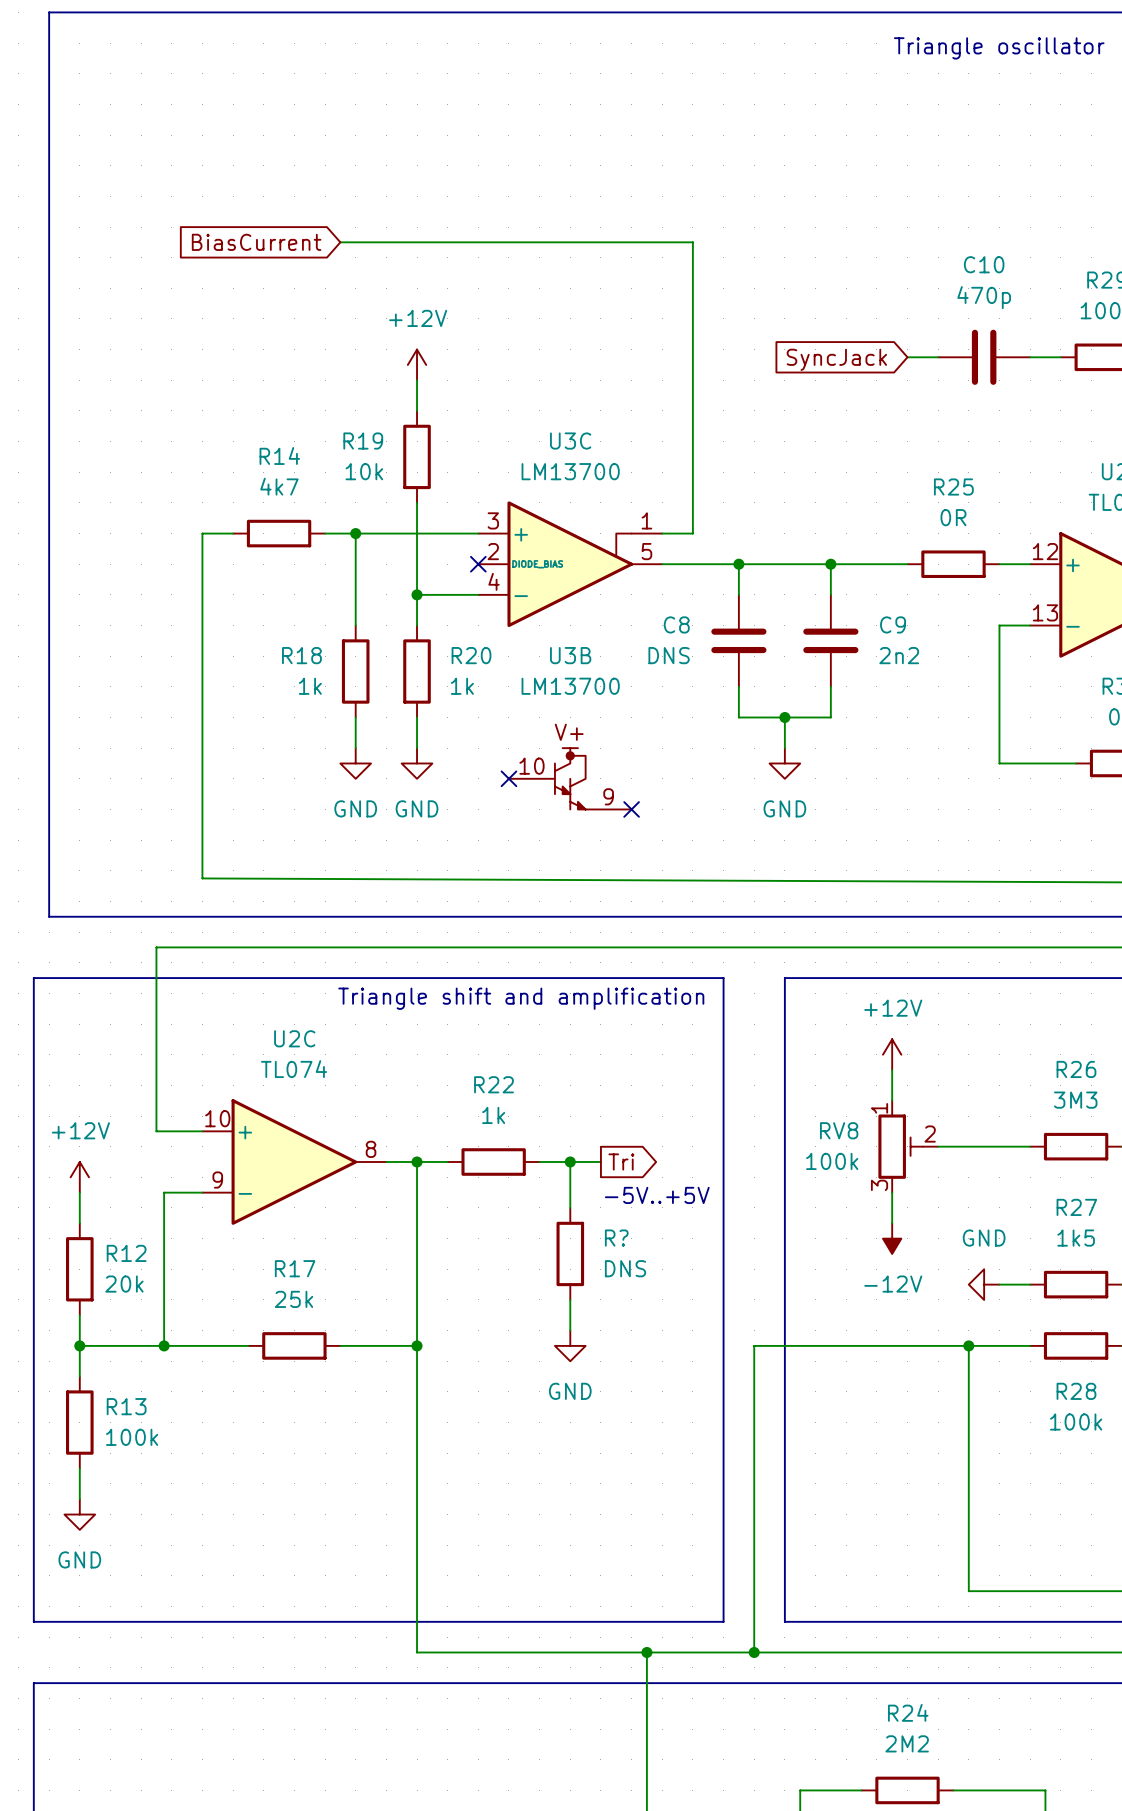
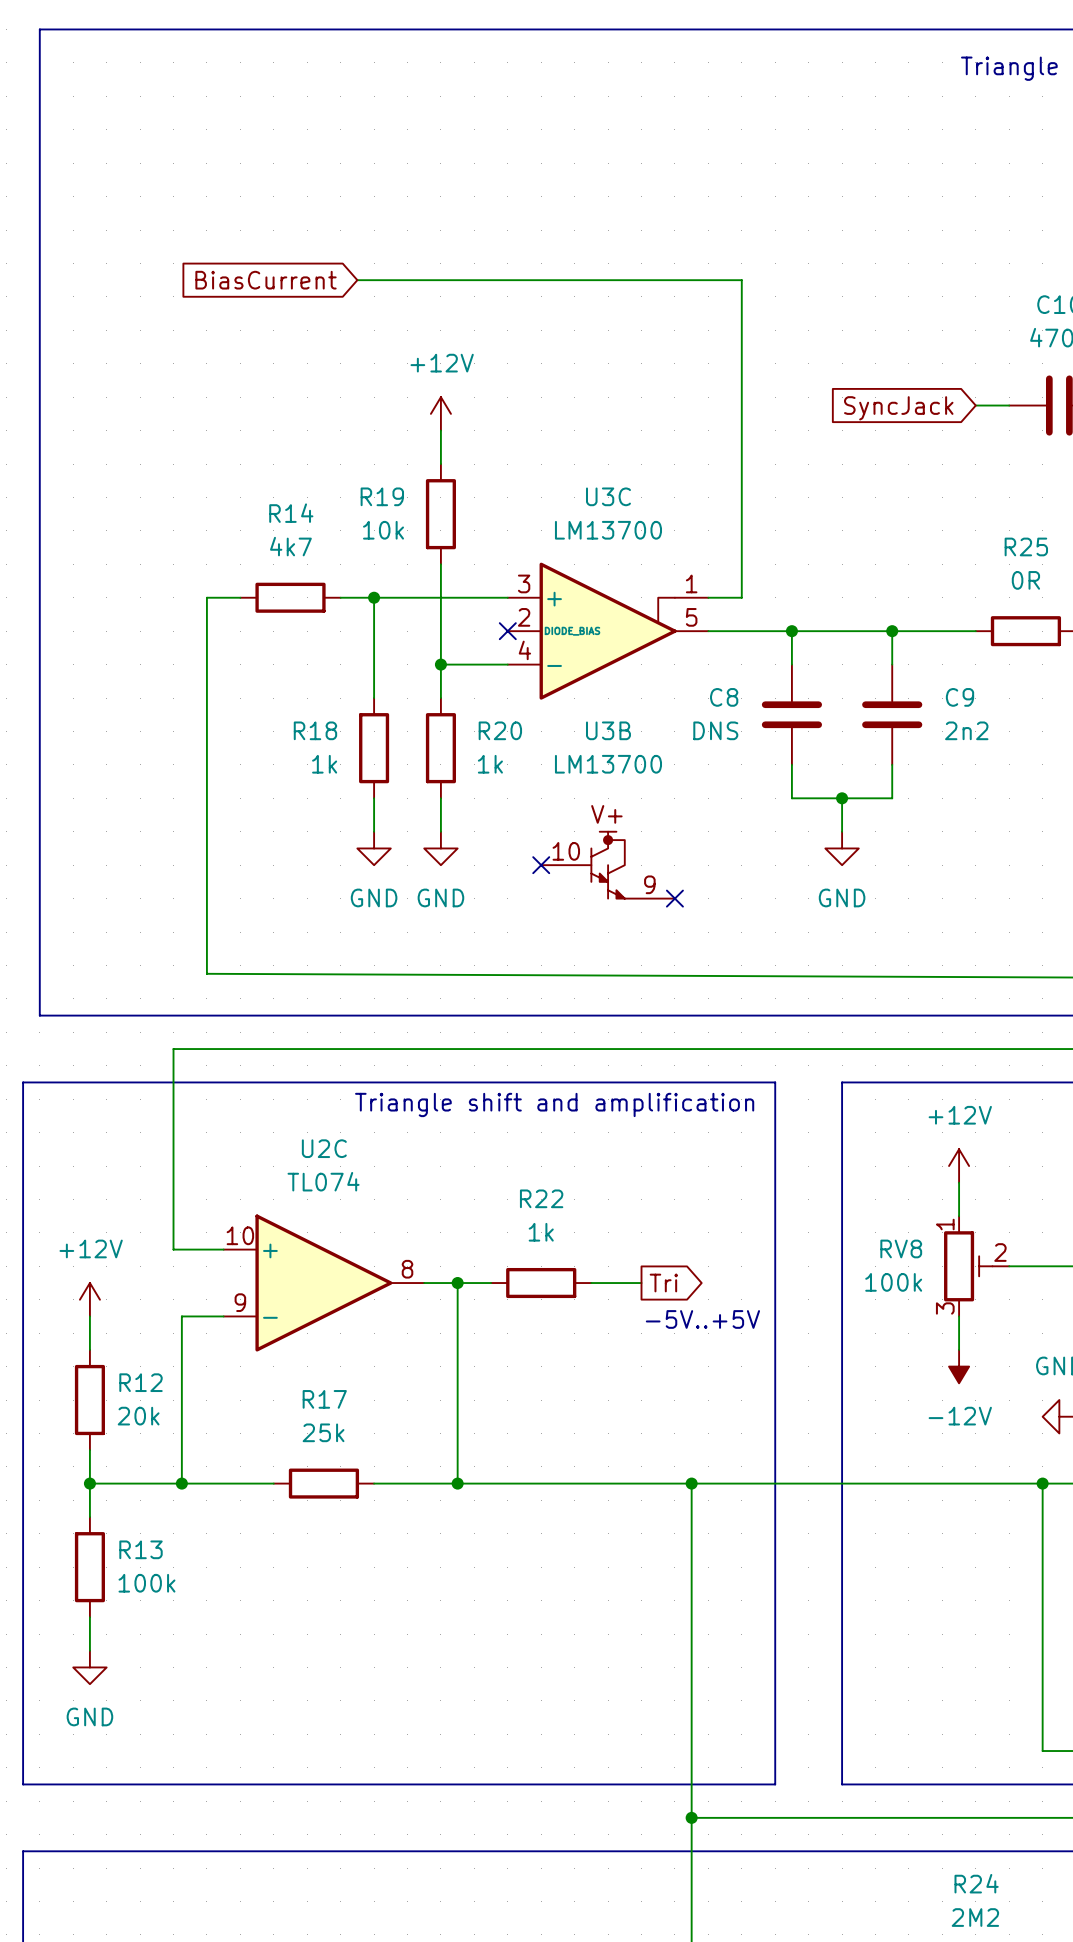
wire: (171, 947) (156, 947) (156, 1131) (171, 1131) -> (173, 1049) (173, 1249)
U2C position: (294, 1162) -> (323, 1283)
wire: (417, 1162) (417, 1652) (646, 1652) -> (691, 1483) (691, 1817)
junction position: (417, 1162) -> (457, 1283)
wire: none -> (457, 1283) (457, 1483)
R22 position: (493, 1162) -> (541, 1283)
wire: (570, 1162) (570, 1207) -> none
junction: (570, 1162) -> none
power symbol position: +12V (79, 1177) -> +12V (89, 1299)
wire: (79, 1192) (79, 1223) -> (89, 1316) (89, 1349)
wire: (179, 1192) (164, 1192) (164, 1345) -> (181, 1316) (181, 1483)
R?: DNS (570, 1253) -> none
R12 position: (79, 1269) -> (89, 1400)
wire: (570, 1299) (570, 1330) -> none
wire: (79, 1315) (79, 1376) -> (89, 1450) (89, 1517)
junction position: (79, 1345) -> (89, 1483)
junction position: (164, 1345) -> (181, 1483)
R17 position: (294, 1345) -> (323, 1483)
junction position: (417, 1345) -> (457, 1483)
power symbol: GND (570, 1345) -> none
junction: none -> (691, 1483)
wire: (754, 1345) (754, 1652) -> (808, 1483) (440, 1483)
R13 position: (79, 1422) -> (89, 1567)
wire: (79, 1468) (79, 1499) -> (89, 1617) (89, 1650)
power symbol position: GND (79, 1514) -> GND (89, 1667)
junction: (754, 1652) -> none

